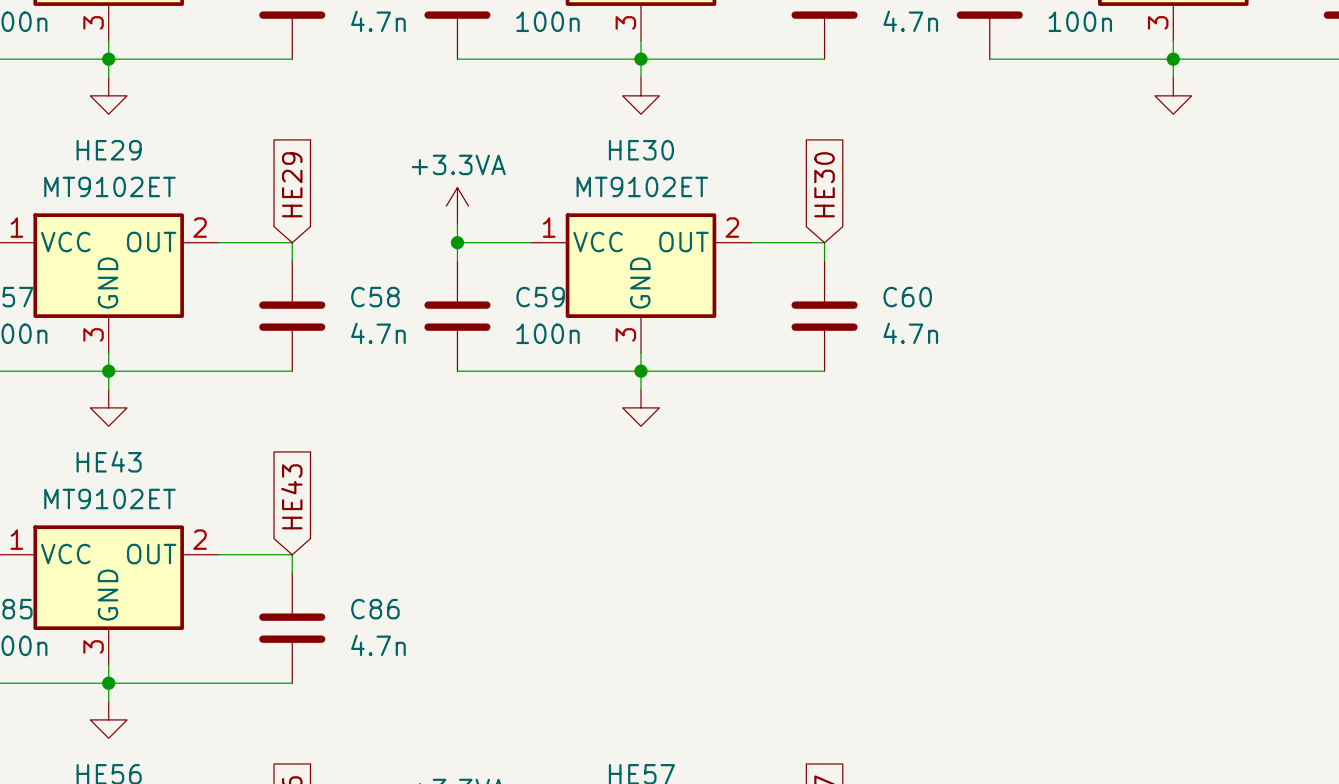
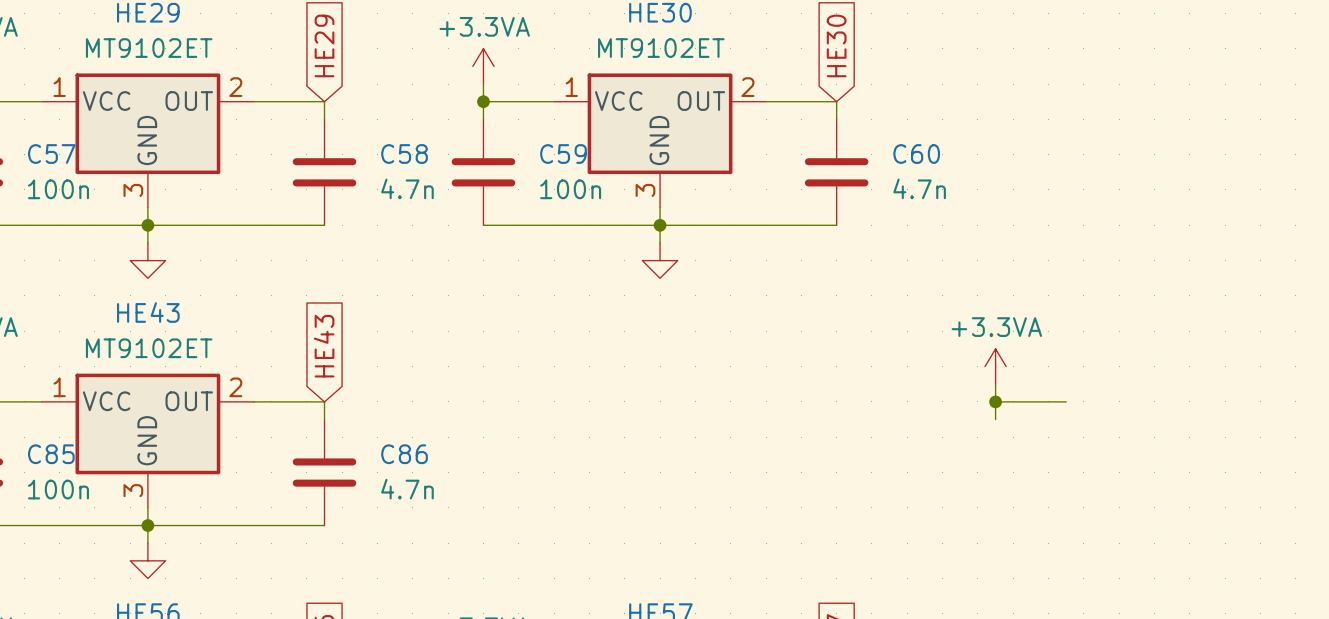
power symbol: none -> +3.3VA (995, 366)
wire: none -> (995, 384) (995, 419)
wire: none -> (995, 401) (1066, 401)
junction: none -> (995, 401)

